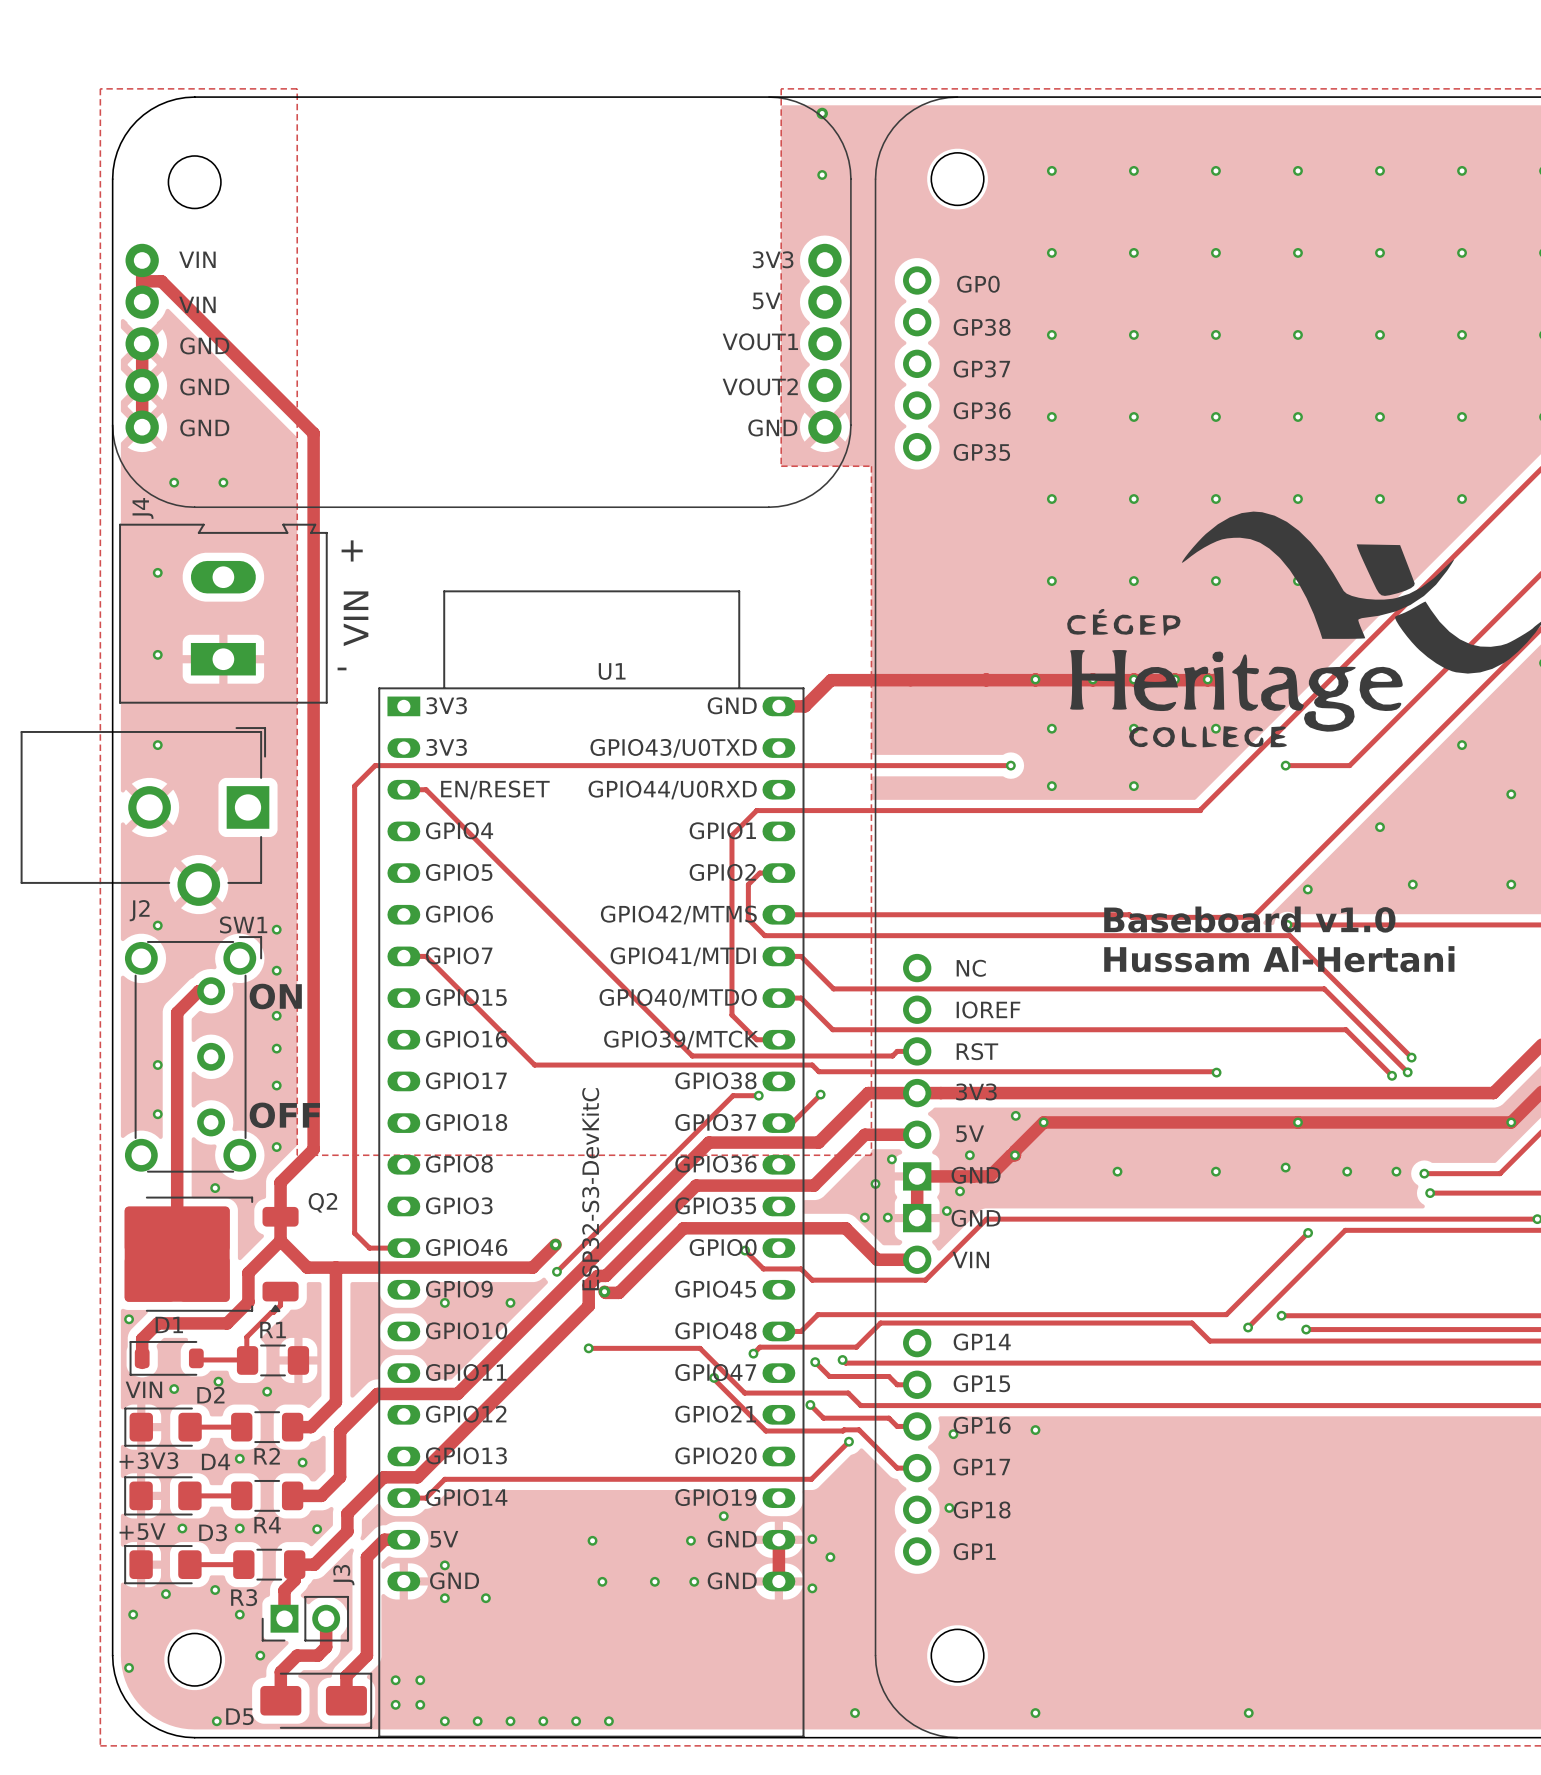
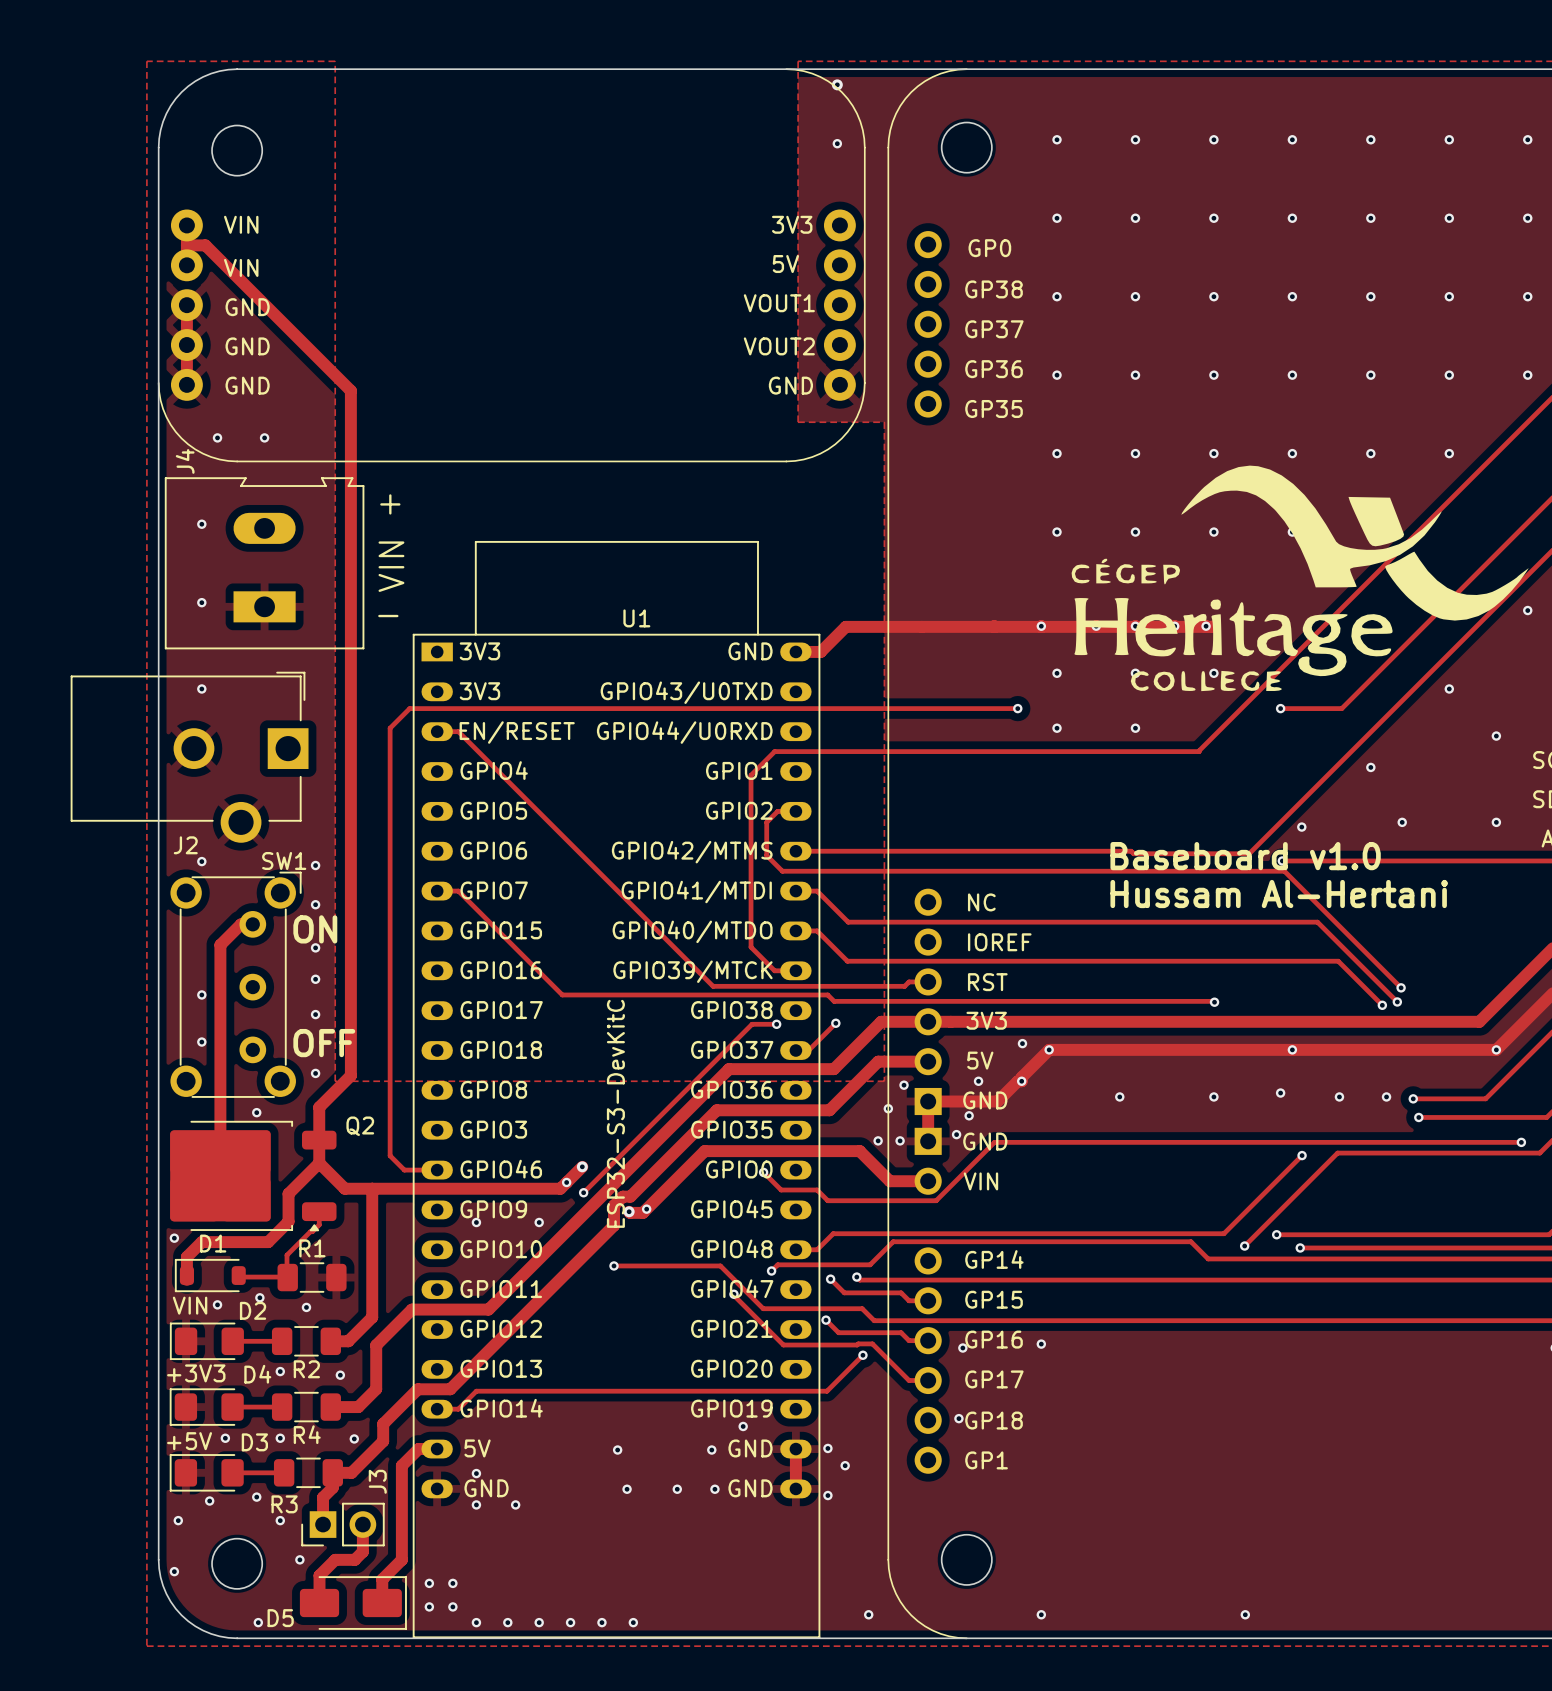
via: none -> (566, 1182)
via: none -> (646, 1209)

